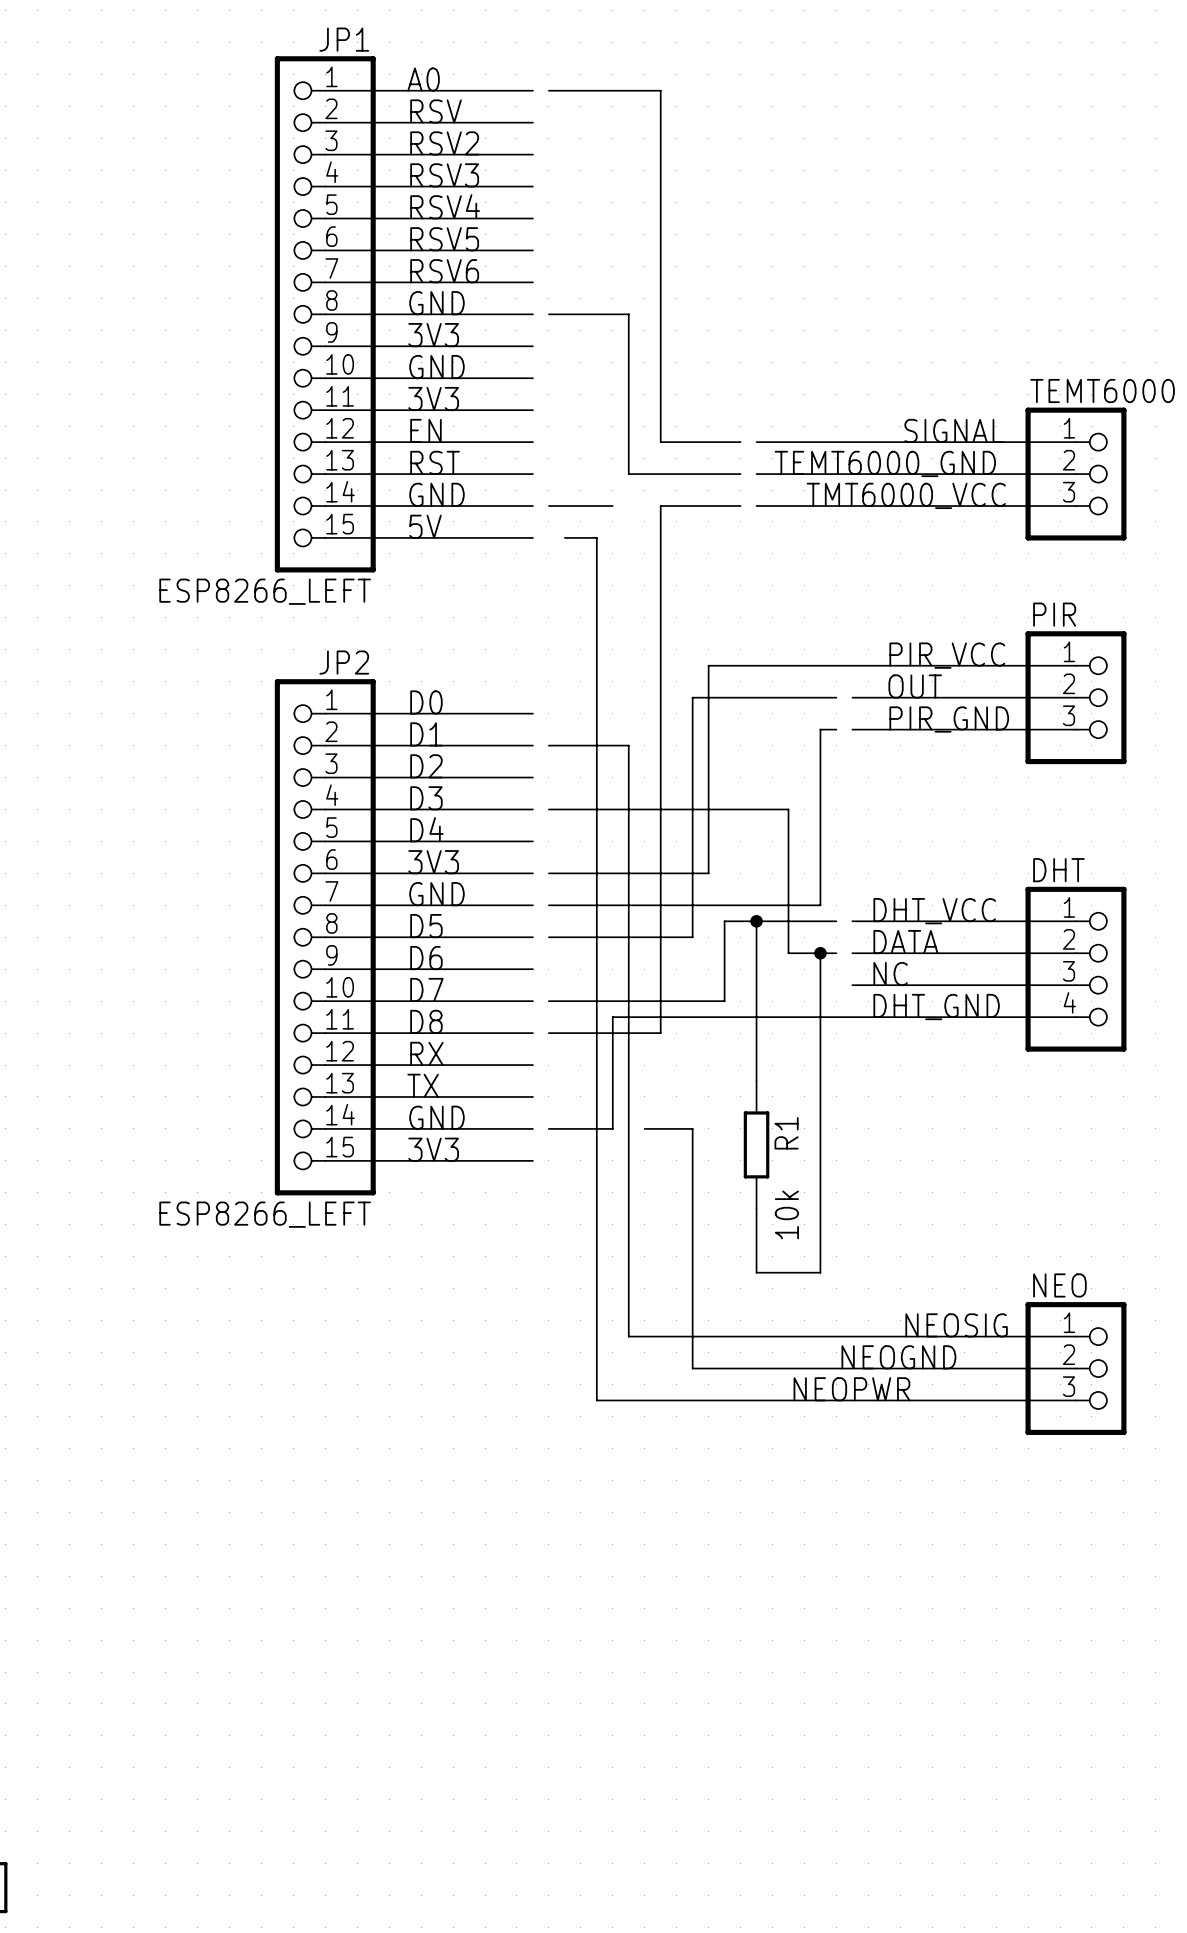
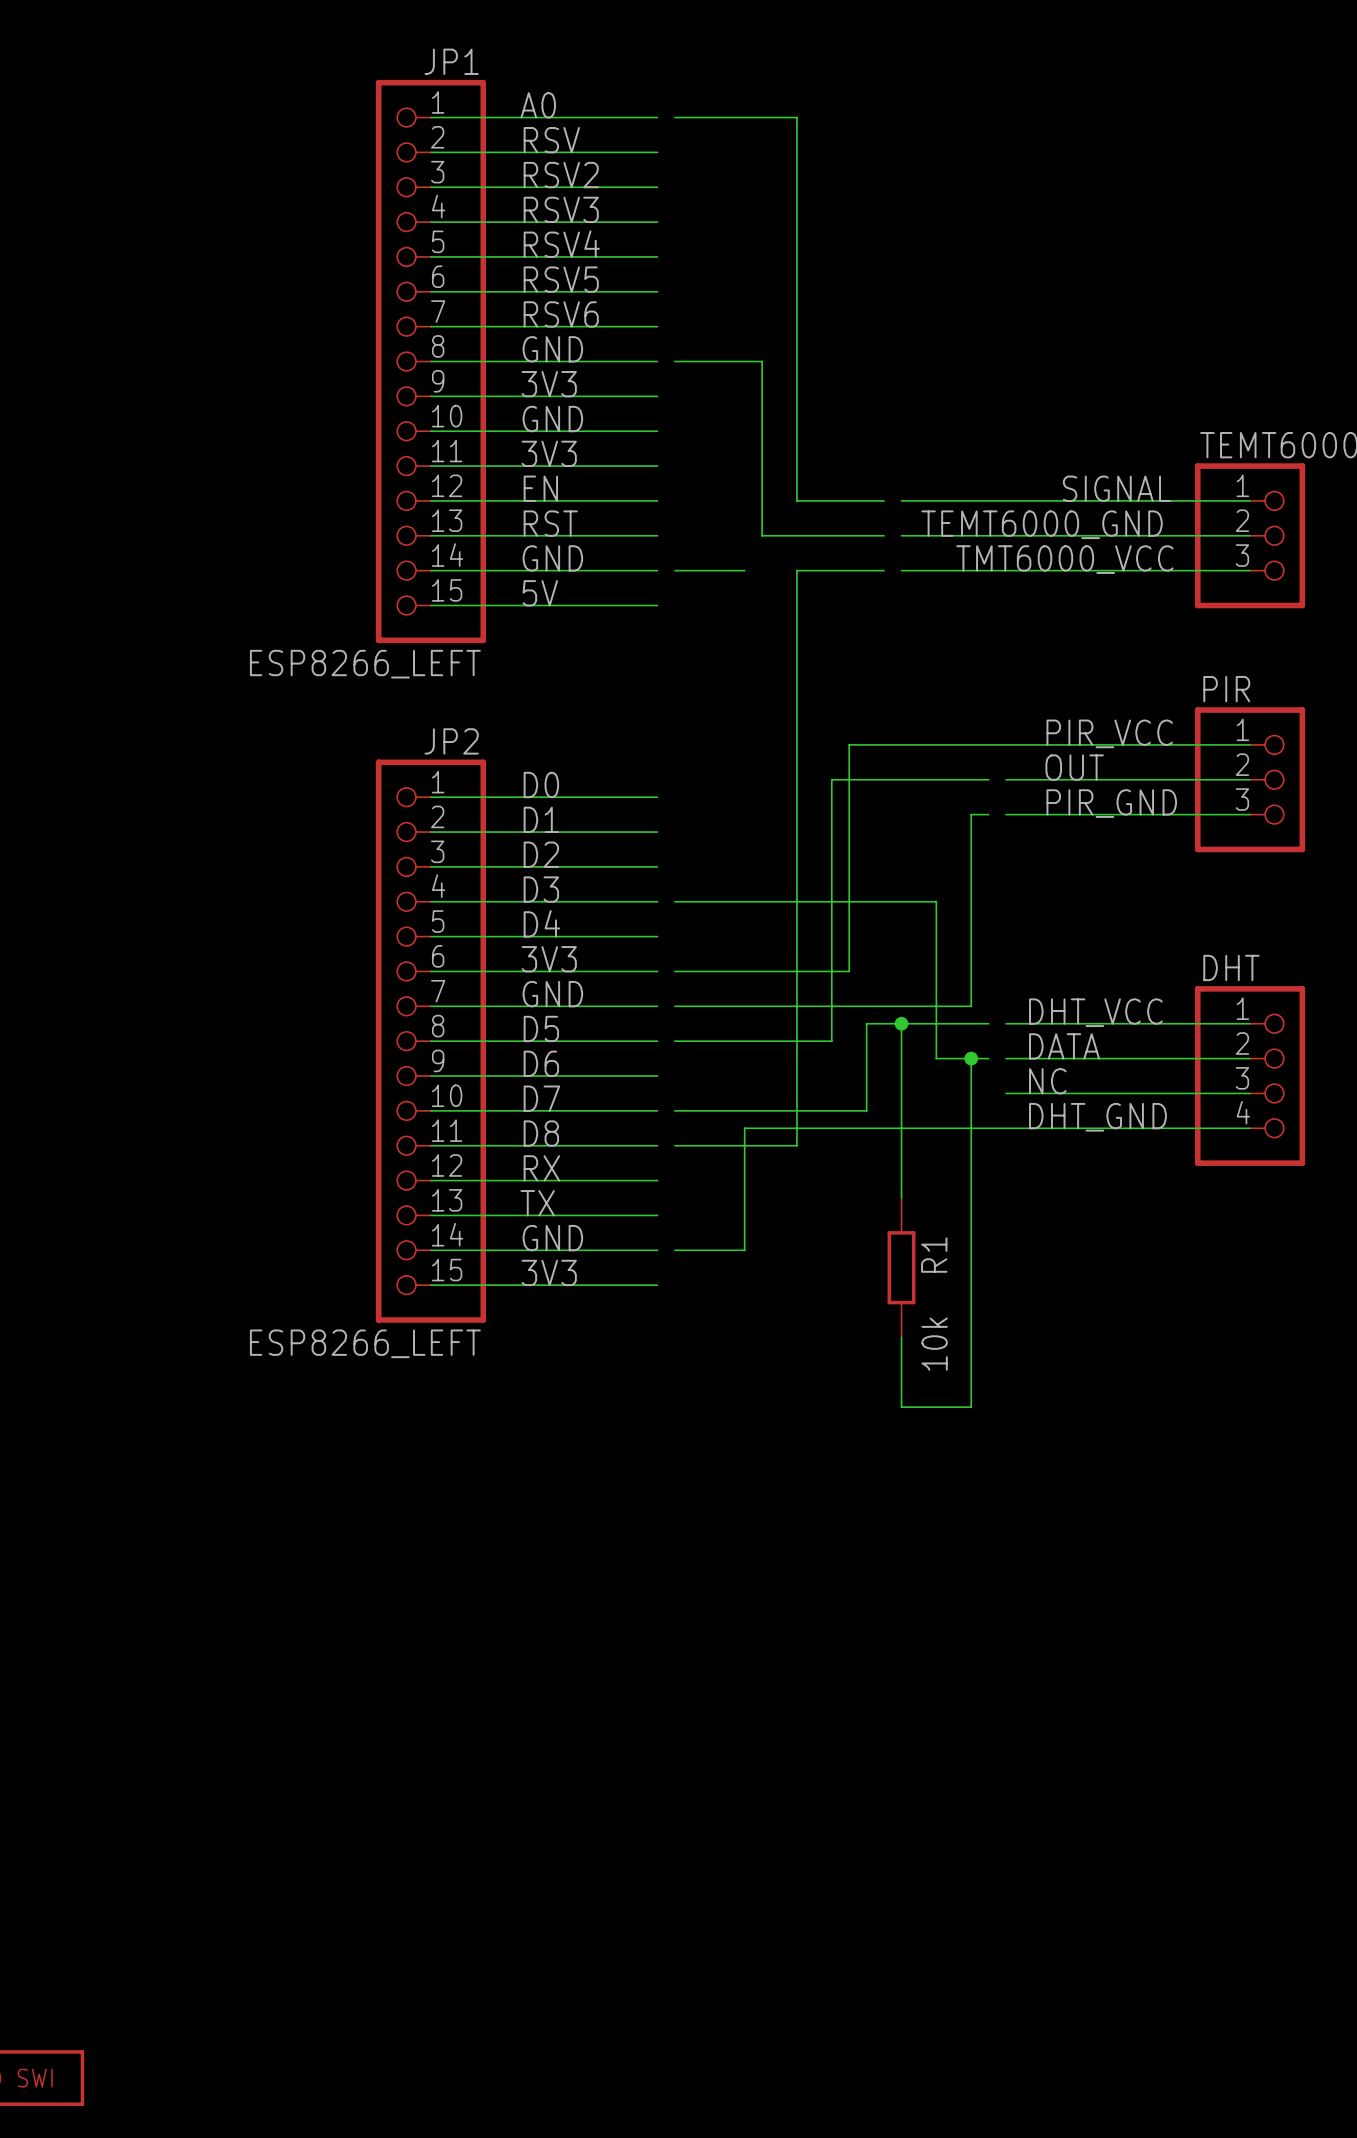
wire: (564, 537) (596, 537) (596, 1400) (1075, 1400) -> none
wire: (548, 745) (628, 745) (628, 1336) (1075, 1336) -> none
wire: (644, 1128) (692, 1128) (692, 1368) (1075, 1368) -> none
label: NEOSIG (956, 1325) -> none
label: NEOGND (898, 1357) -> none
NEO: (1075, 1368) -> none
label: NEOPWR (851, 1389) -> none

